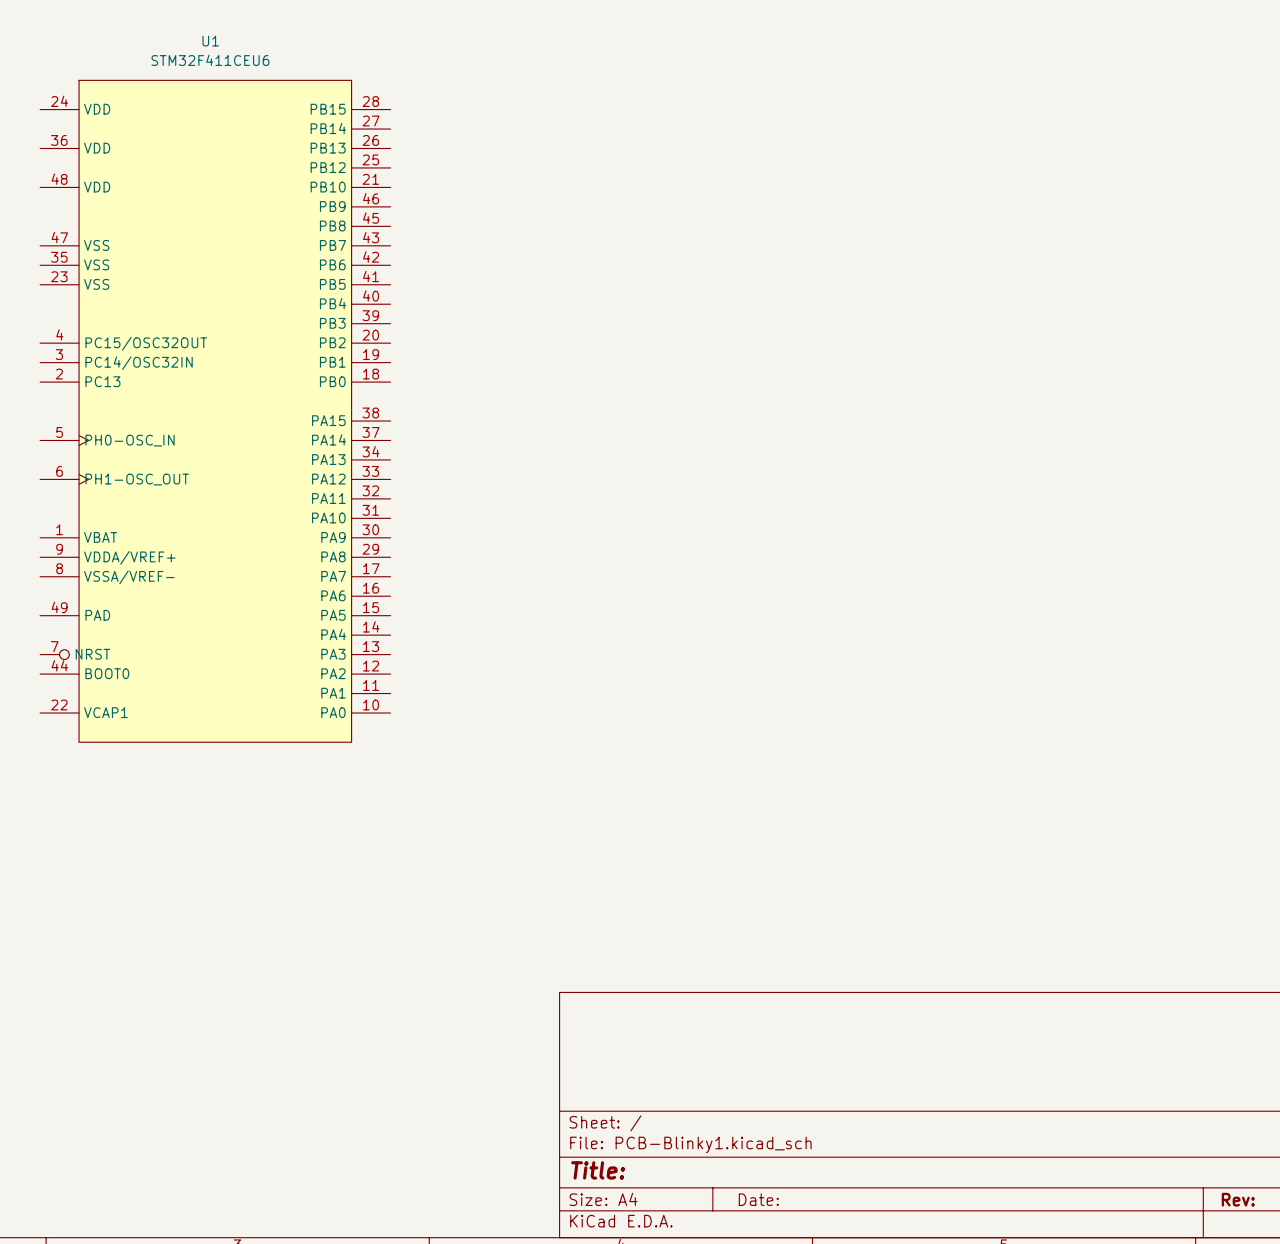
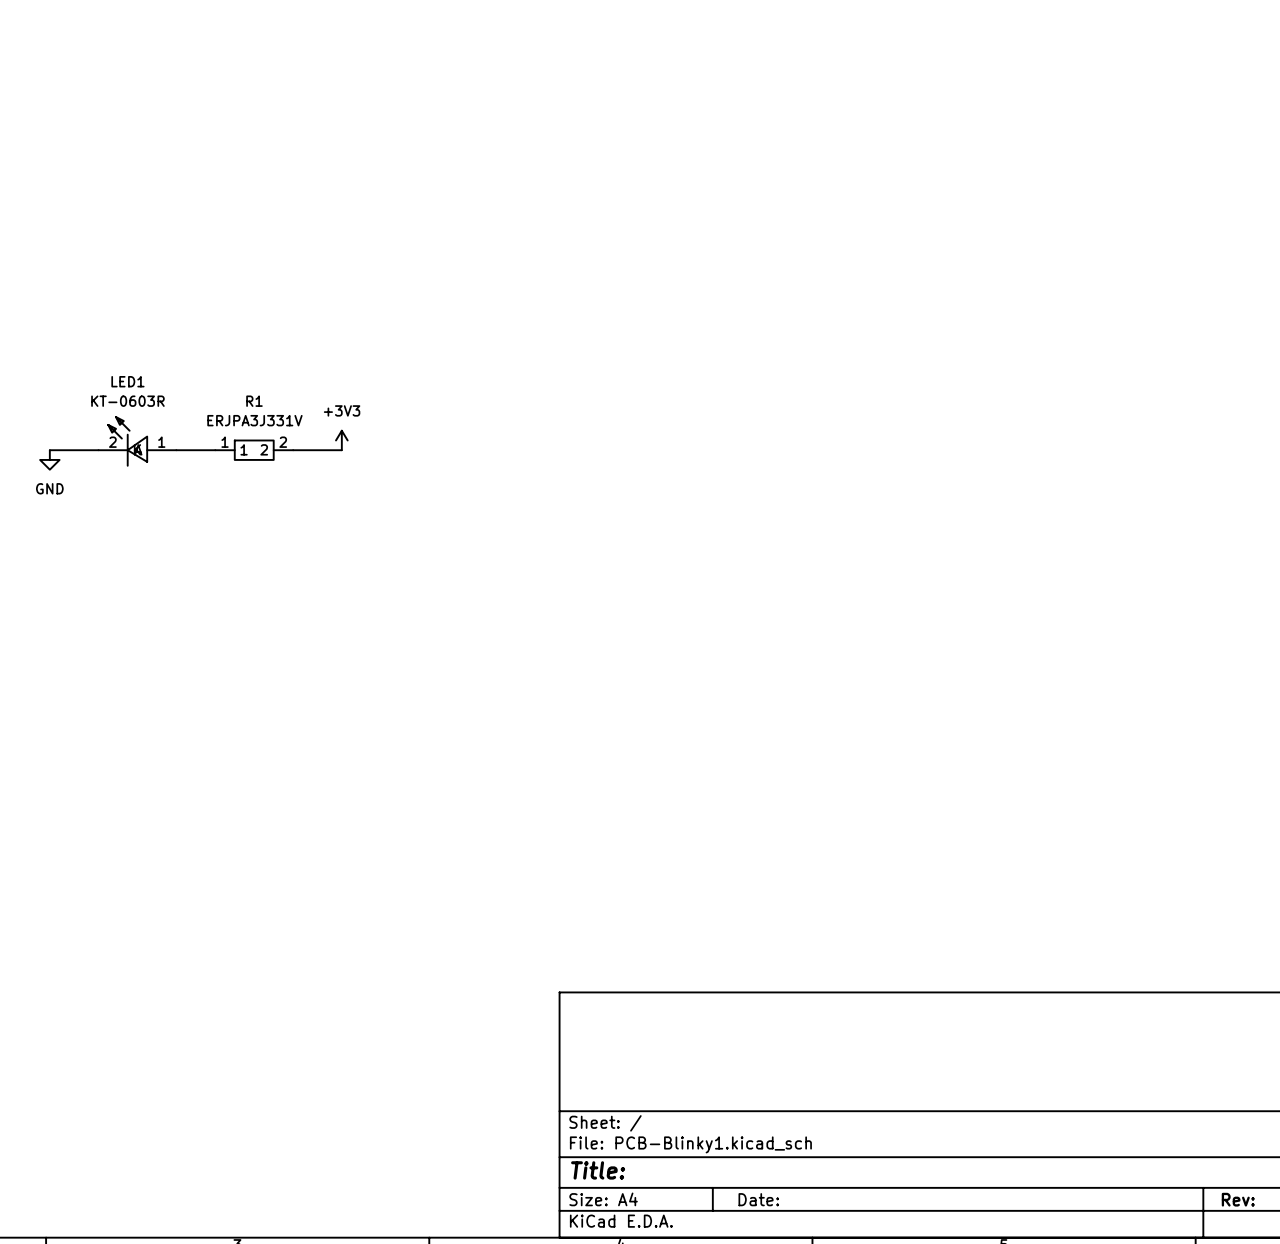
U1: STM32F411CEU6 (215, 411) -> none
power symbol: none -> +3V3 (341, 440)
LED1: none -> KT-0603R (137, 441)
wire: none -> (49, 450) (98, 450)
R1: none -> ERJPA3J331V (254, 450)
power symbol: none -> GND (49, 459)

